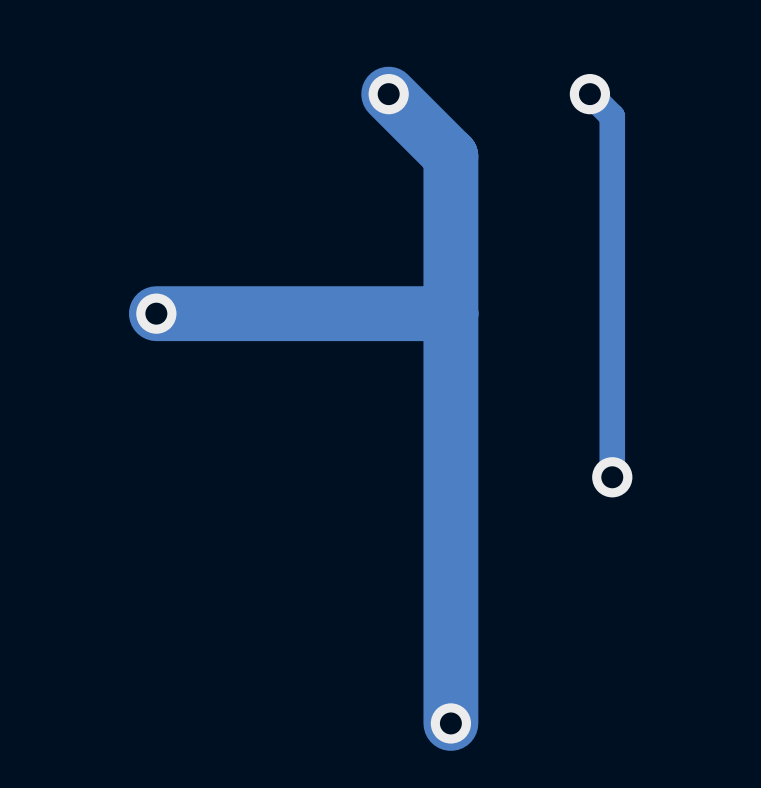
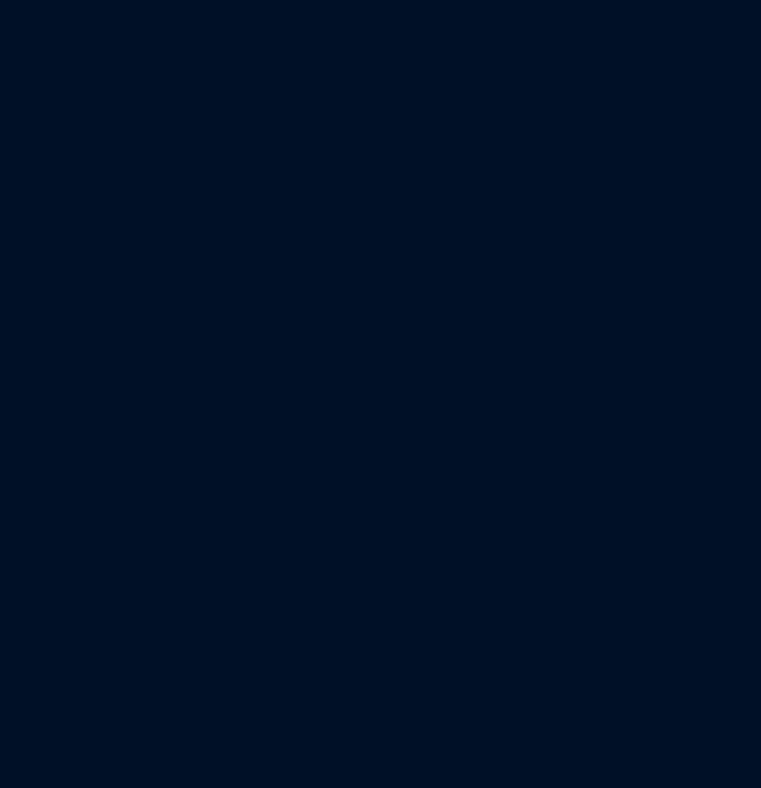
track: (388, 94) (450, 156) (450, 723) -> none
via: (388, 94) -> none
track: (589, 94) (612, 116) (612, 477) -> none
via: (589, 94) -> none
via: (156, 313) -> none
track: (450, 313) (156, 313) -> none
via: (612, 477) -> none
via: (450, 723) -> none

